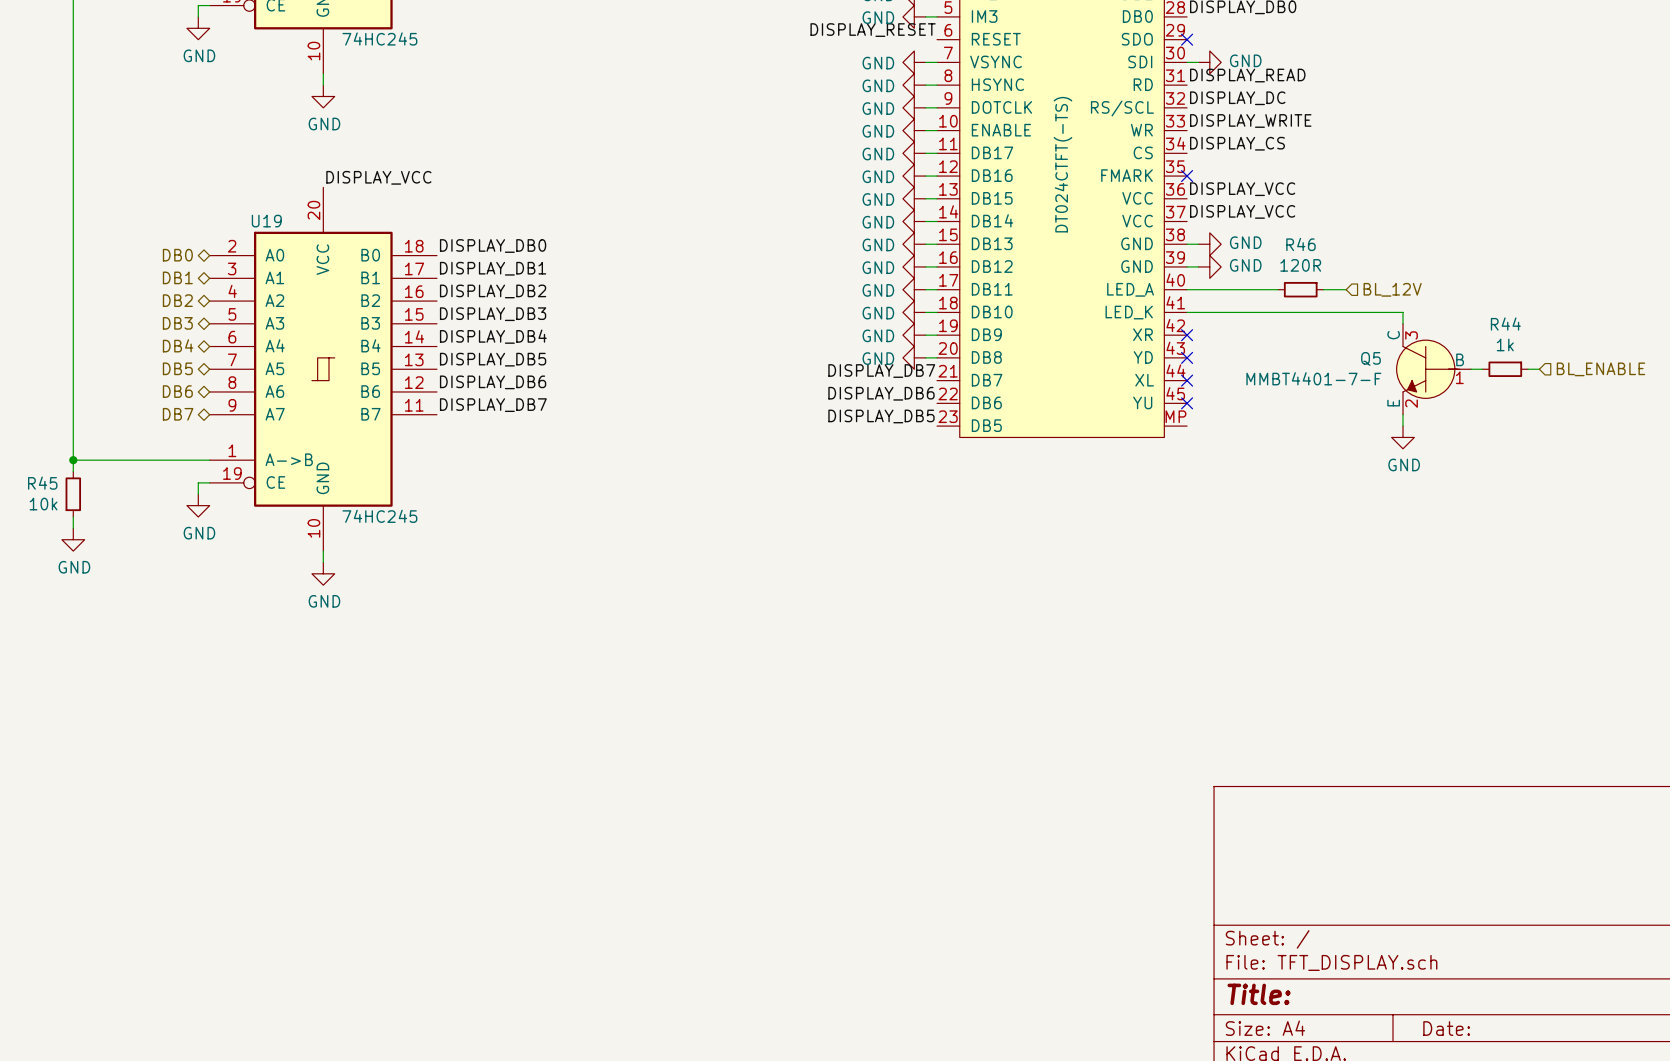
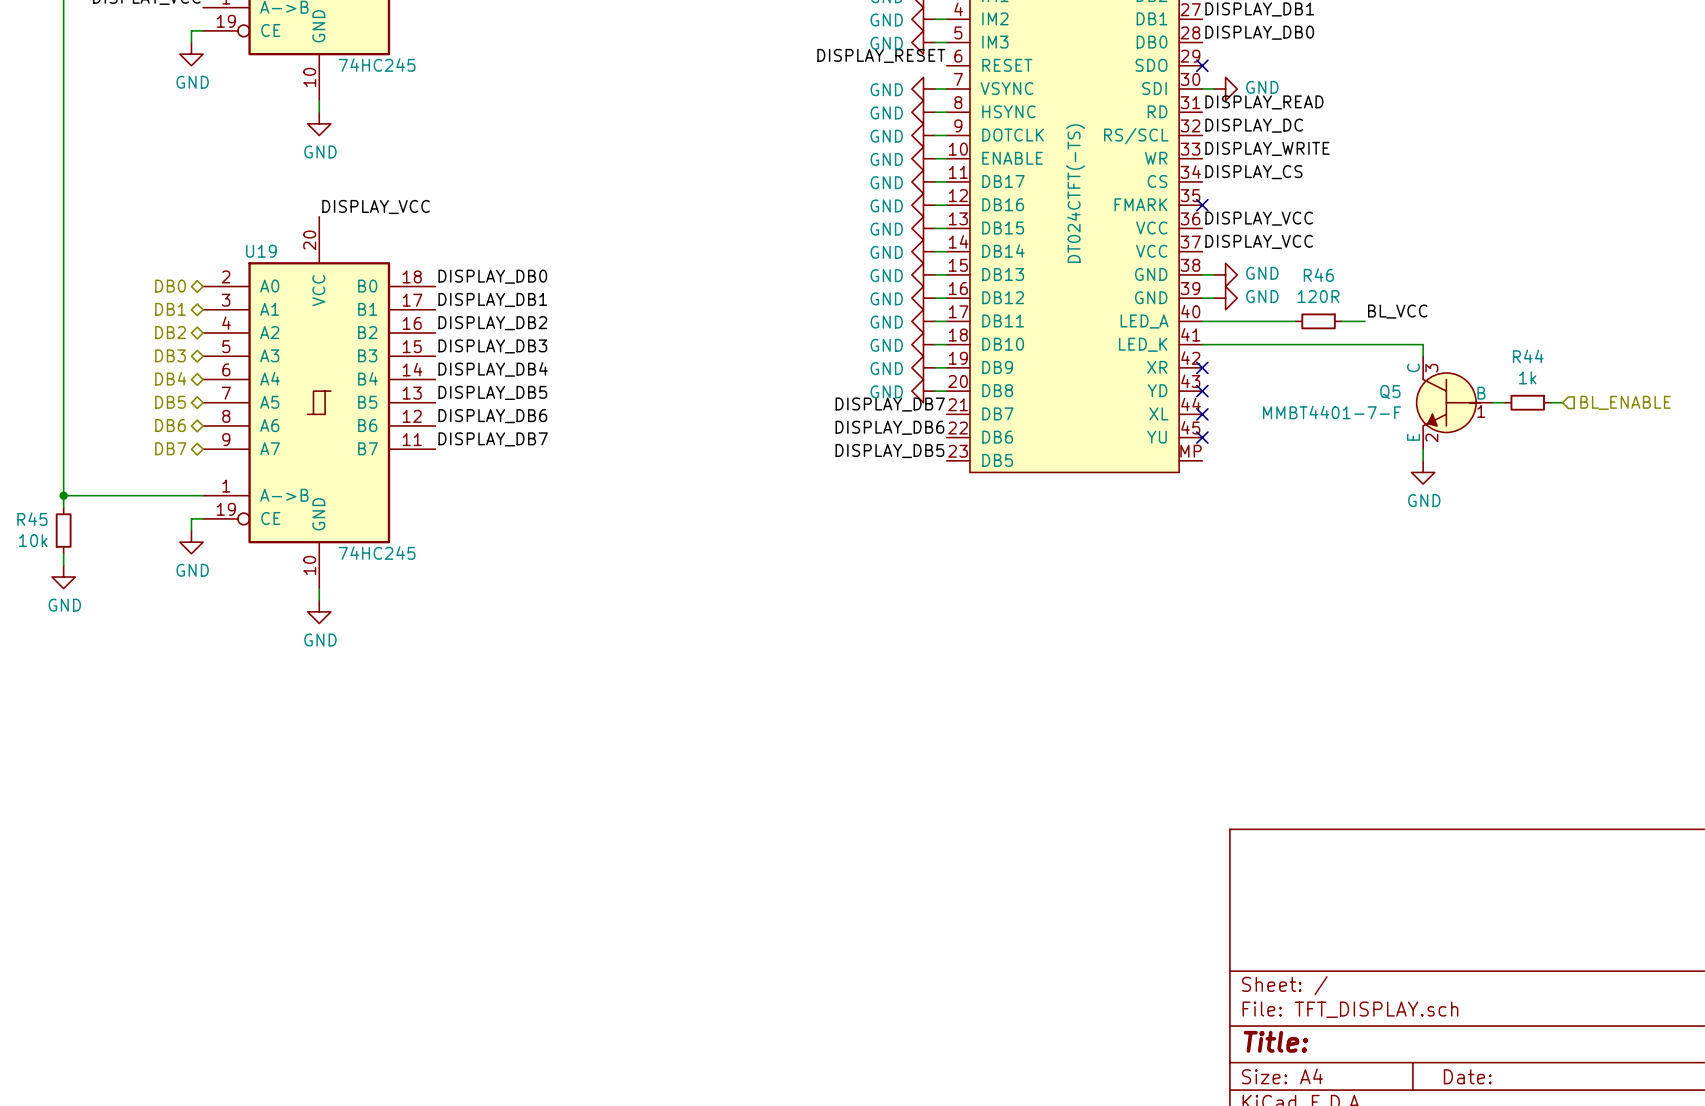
label: none -> BL_VCC (1397, 311)
hierarchical label: BL_12V (1392, 289) -> none

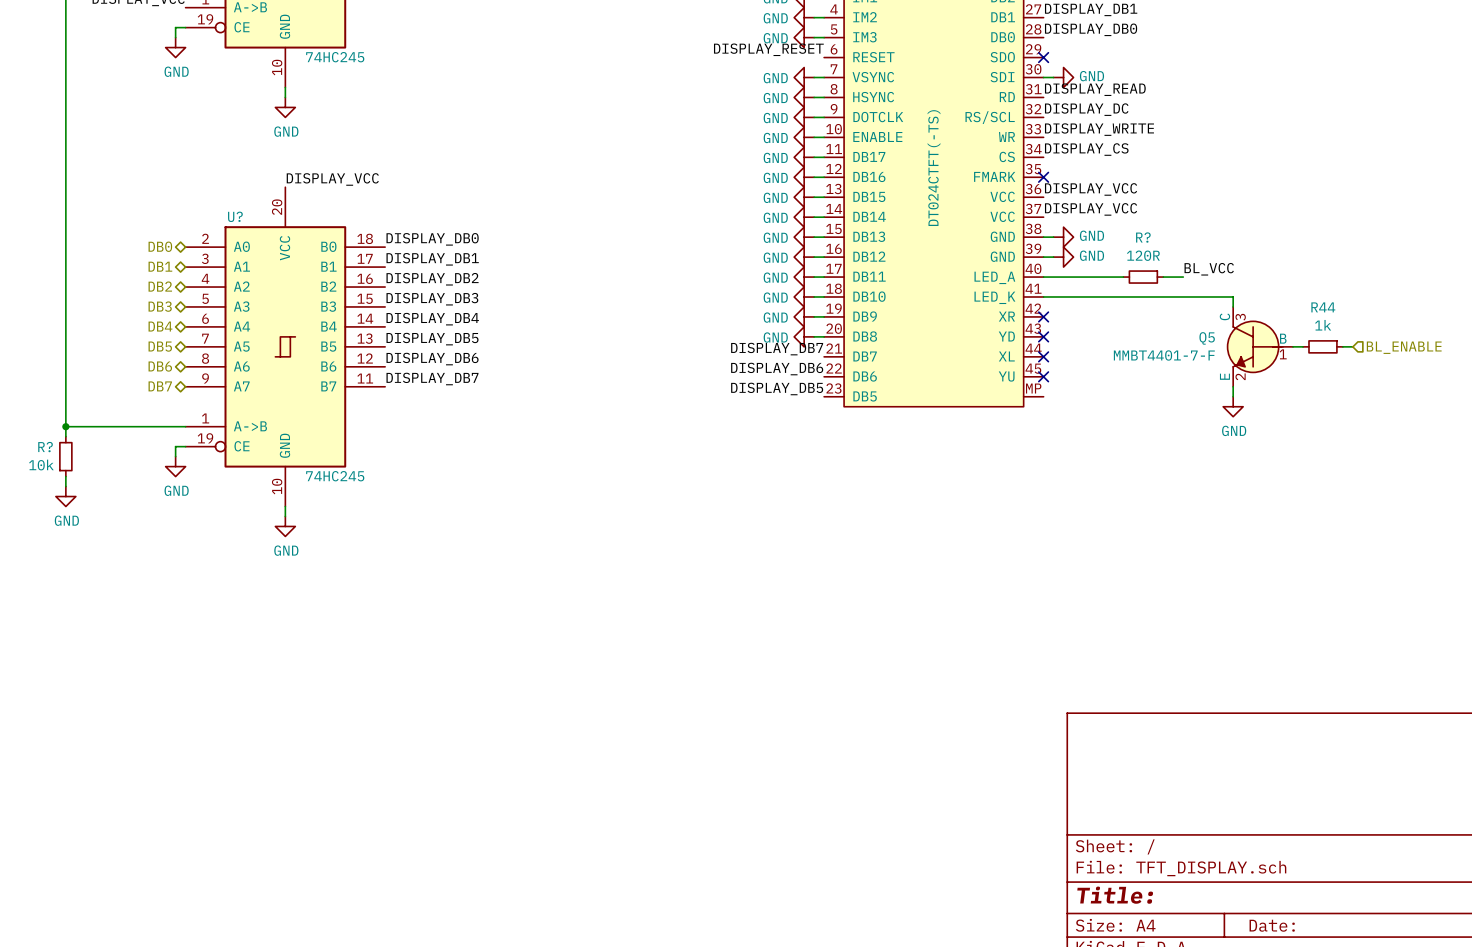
U19 name: U19 (261, 251) -> U? (235, 216)
R46 name: R46 (1318, 275) -> R? (1143, 237)
R45 name: R45 (32, 519) -> R? (45, 447)

